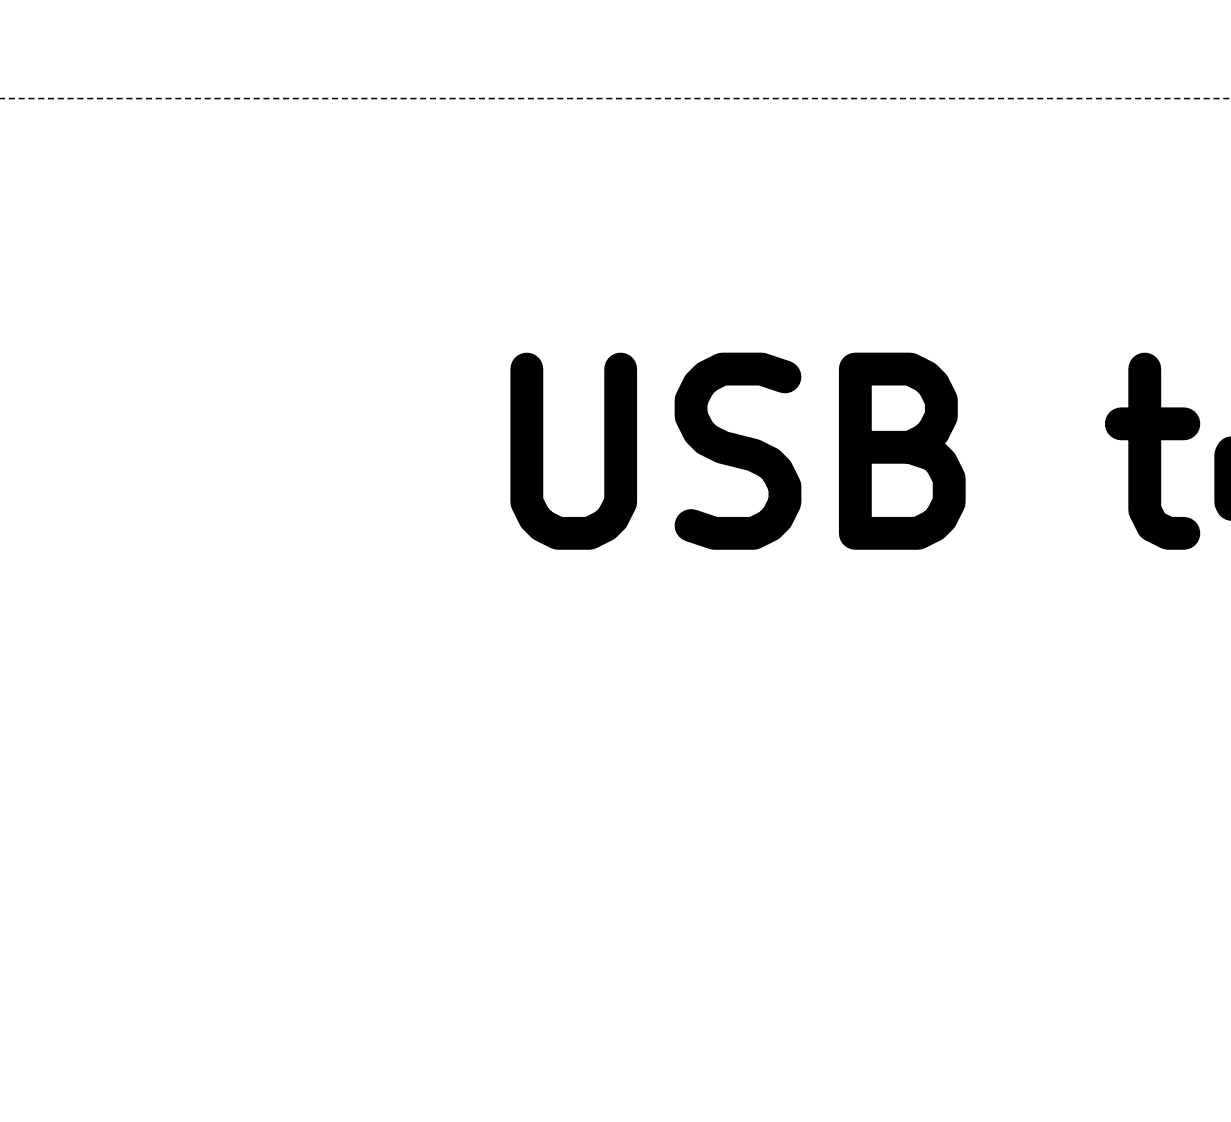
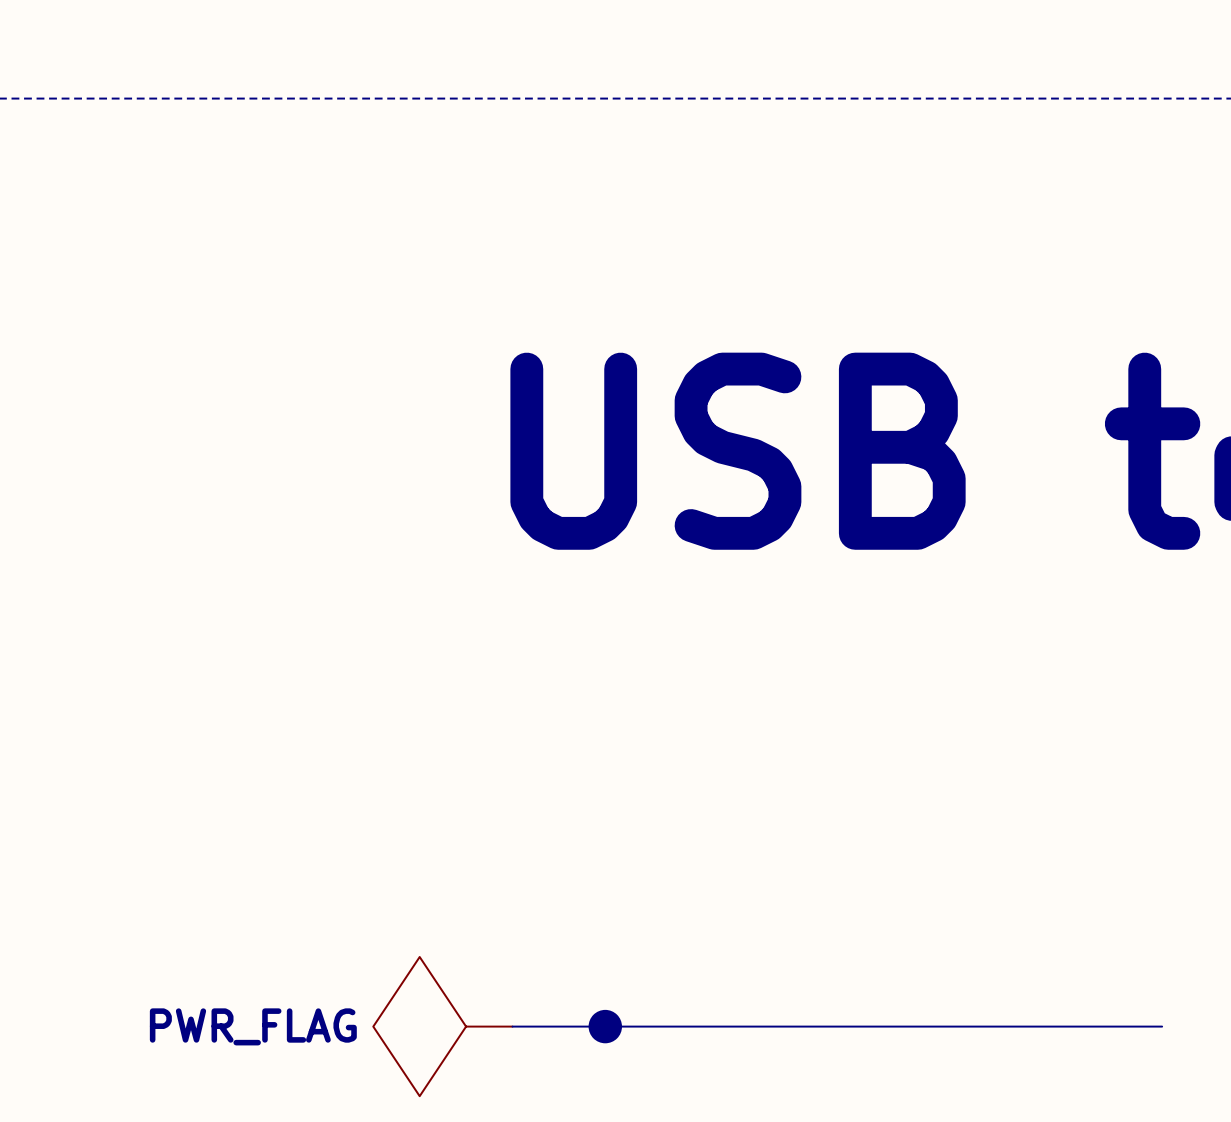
power symbol: none -> PWR_FLAG (442, 1026)
wire: none -> (512, 1026) (1162, 1026)
junction: none -> (605, 1026)

